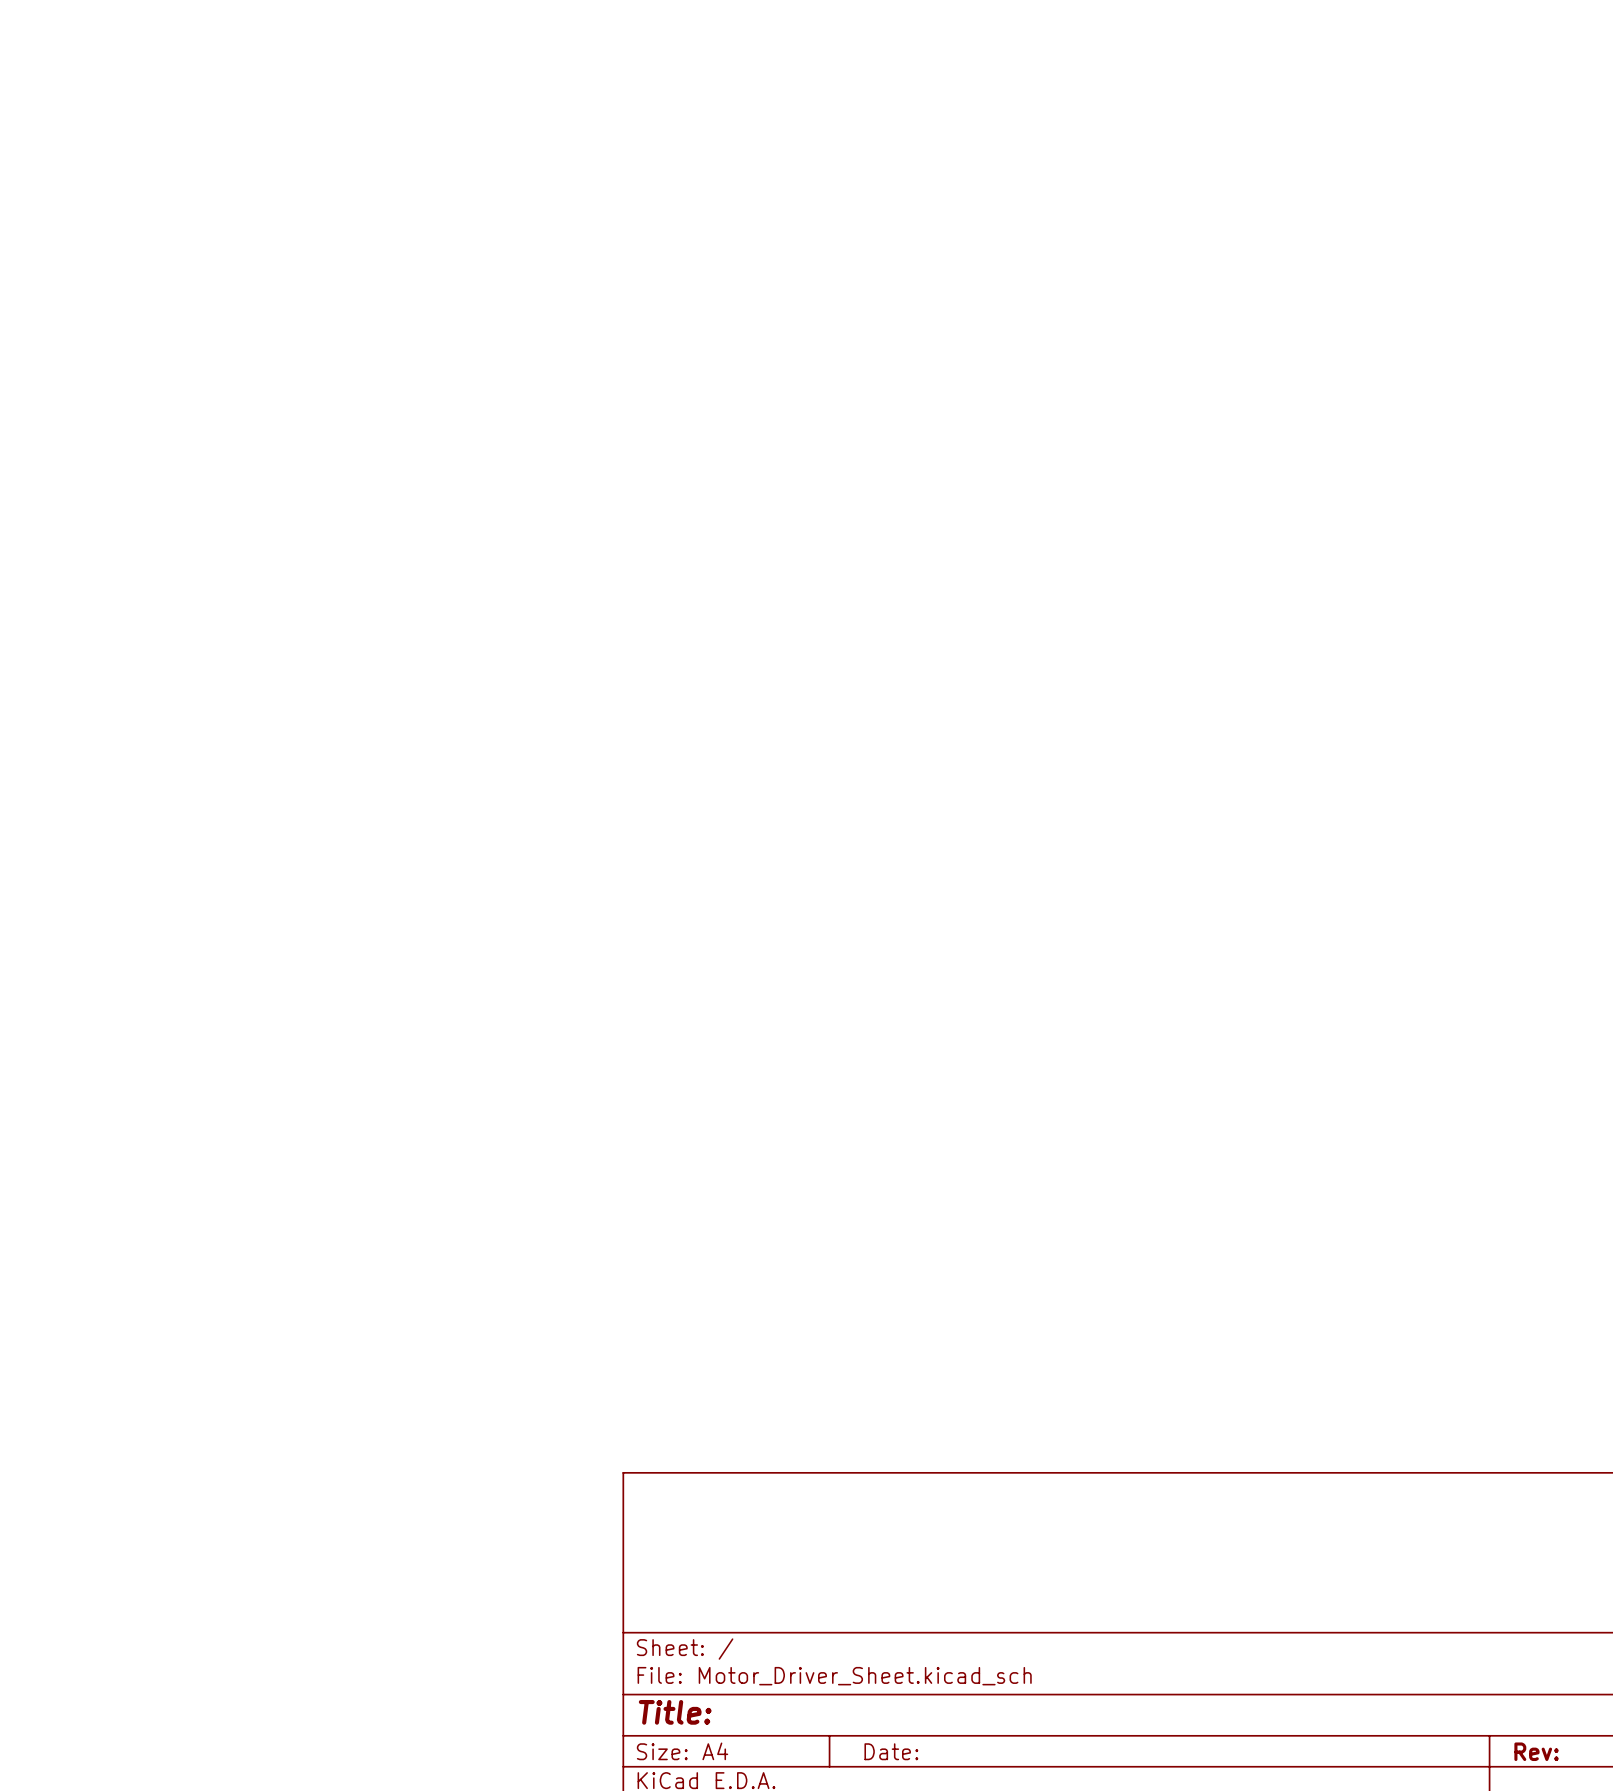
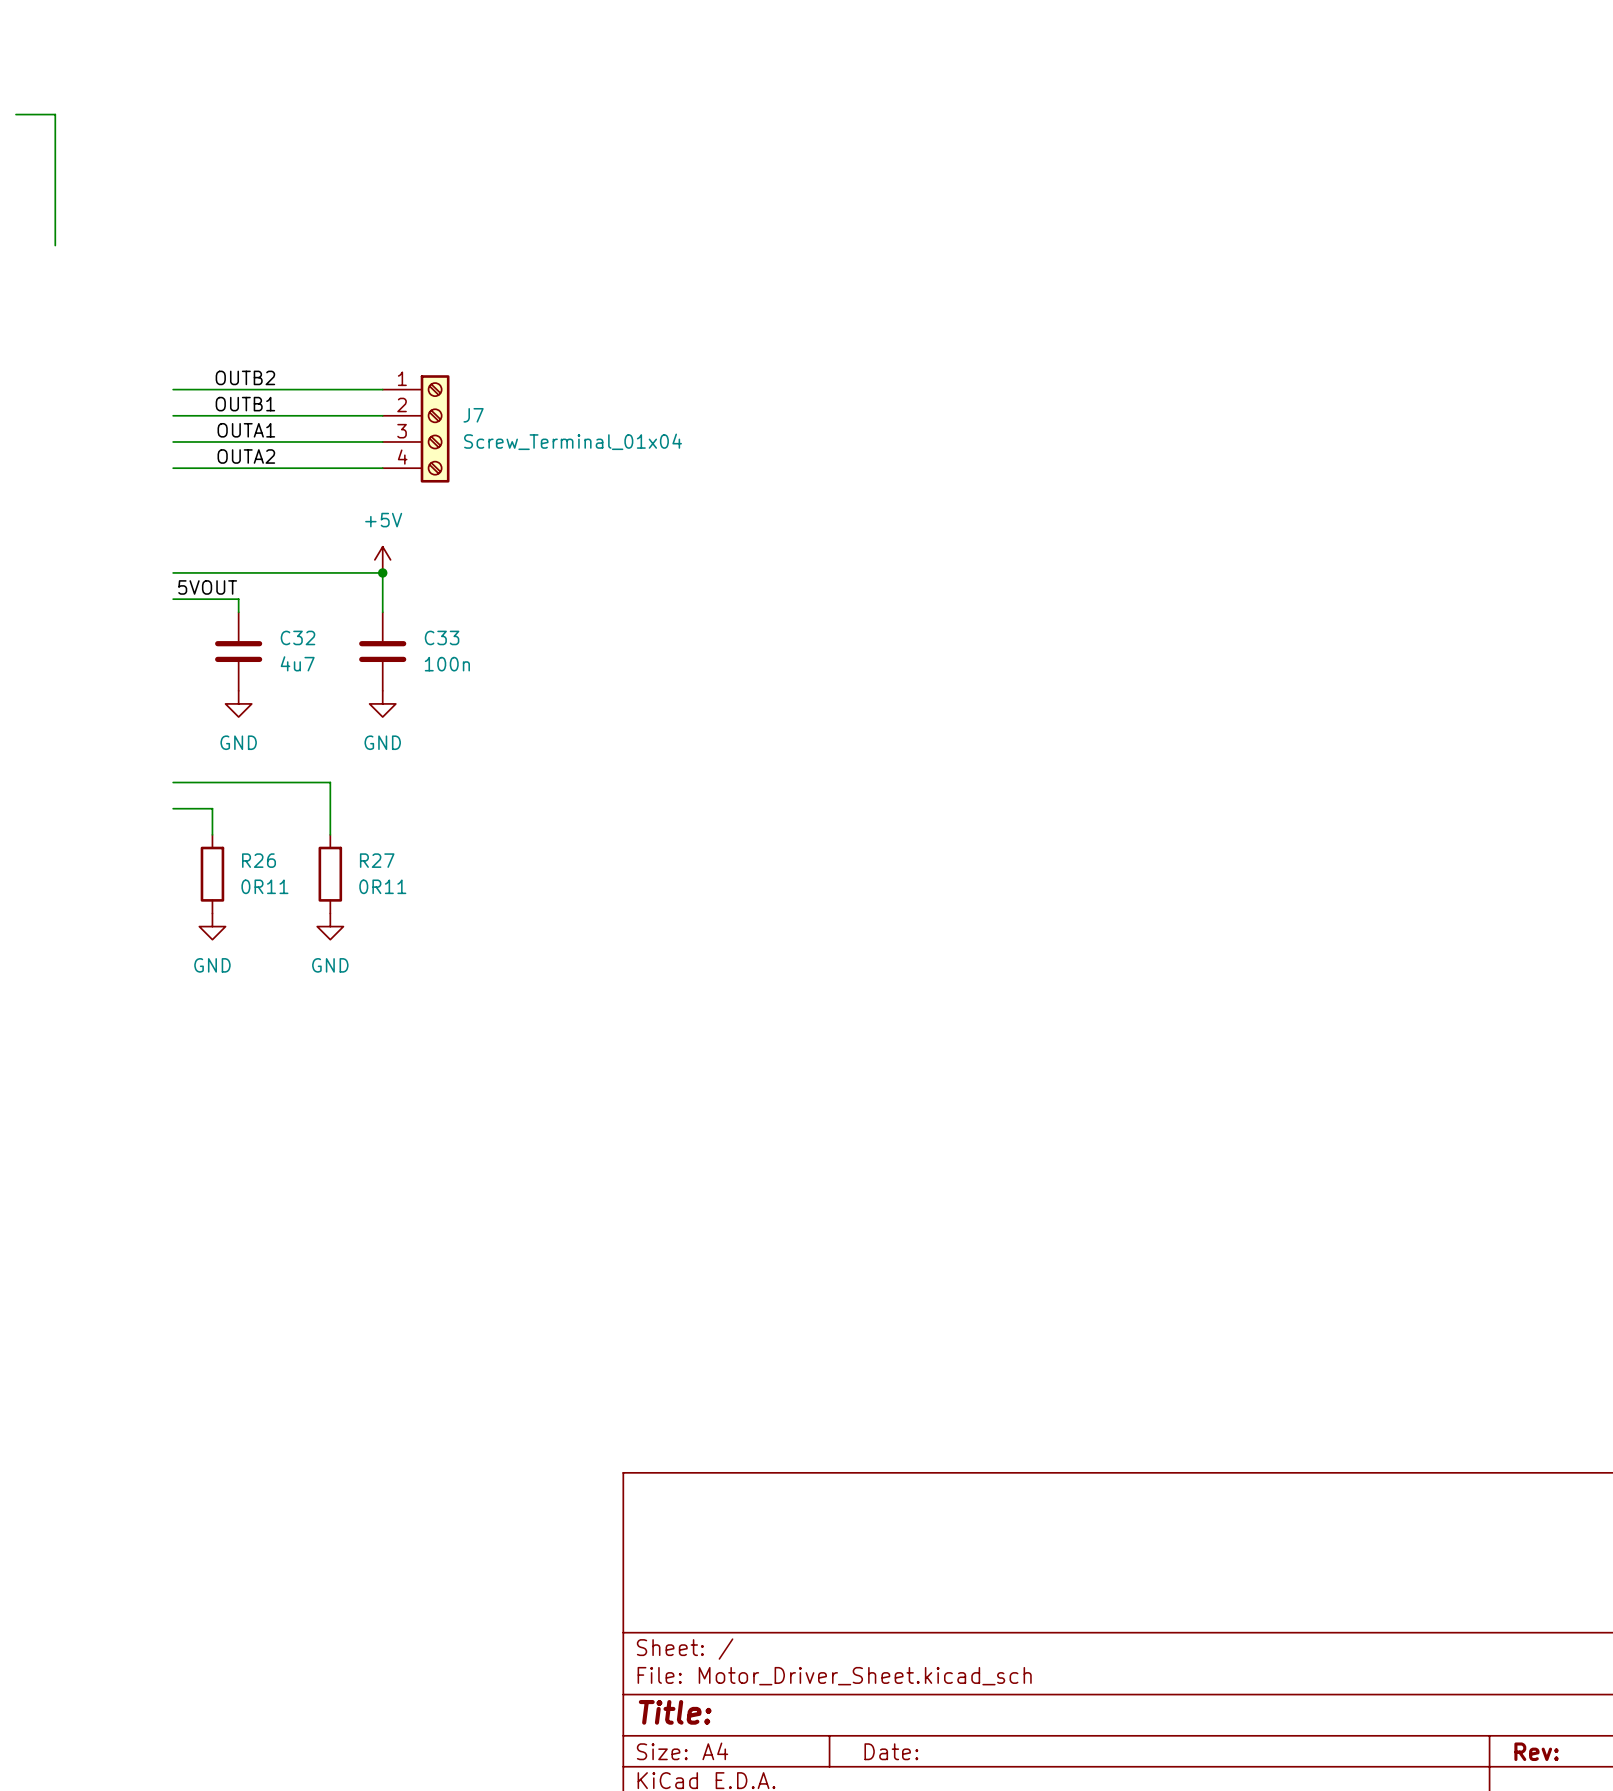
wire: none -> (15, 114) (55, 114) (55, 245)
label: none -> OUTB2 (245, 377)
wire: none -> (173, 389) (382, 389)
label: none -> OUTB1 (245, 404)
wire: none -> (173, 415) (382, 415)
J7: none -> Screw_Terminal_01x04 (416, 428)
label: none -> OUTA1 (246, 430)
wire: none -> (173, 441) (382, 441)
label: none -> OUTA2 (246, 456)
wire: none -> (173, 468) (382, 468)
power symbol: none -> +5V (382, 559)
wire: none -> (173, 572) (382, 572) (382, 612)
junction: none -> (382, 572)
label: none -> 5VOUT (207, 587)
wire: none -> (173, 599) (238, 599) (238, 612)
C32: none -> 4u7 (238, 651)
C33: none -> 100n (382, 651)
power symbol: none -> GND (238, 703)
power symbol: none -> GND (382, 703)
wire: none -> (173, 782) (330, 782) (330, 834)
wire: none -> (173, 808) (212, 808) (212, 834)
R26: none -> 0R11 (212, 874)
R27: none -> 0R11 (330, 874)
power symbol: none -> GND (212, 926)
power symbol: none -> GND (330, 926)

